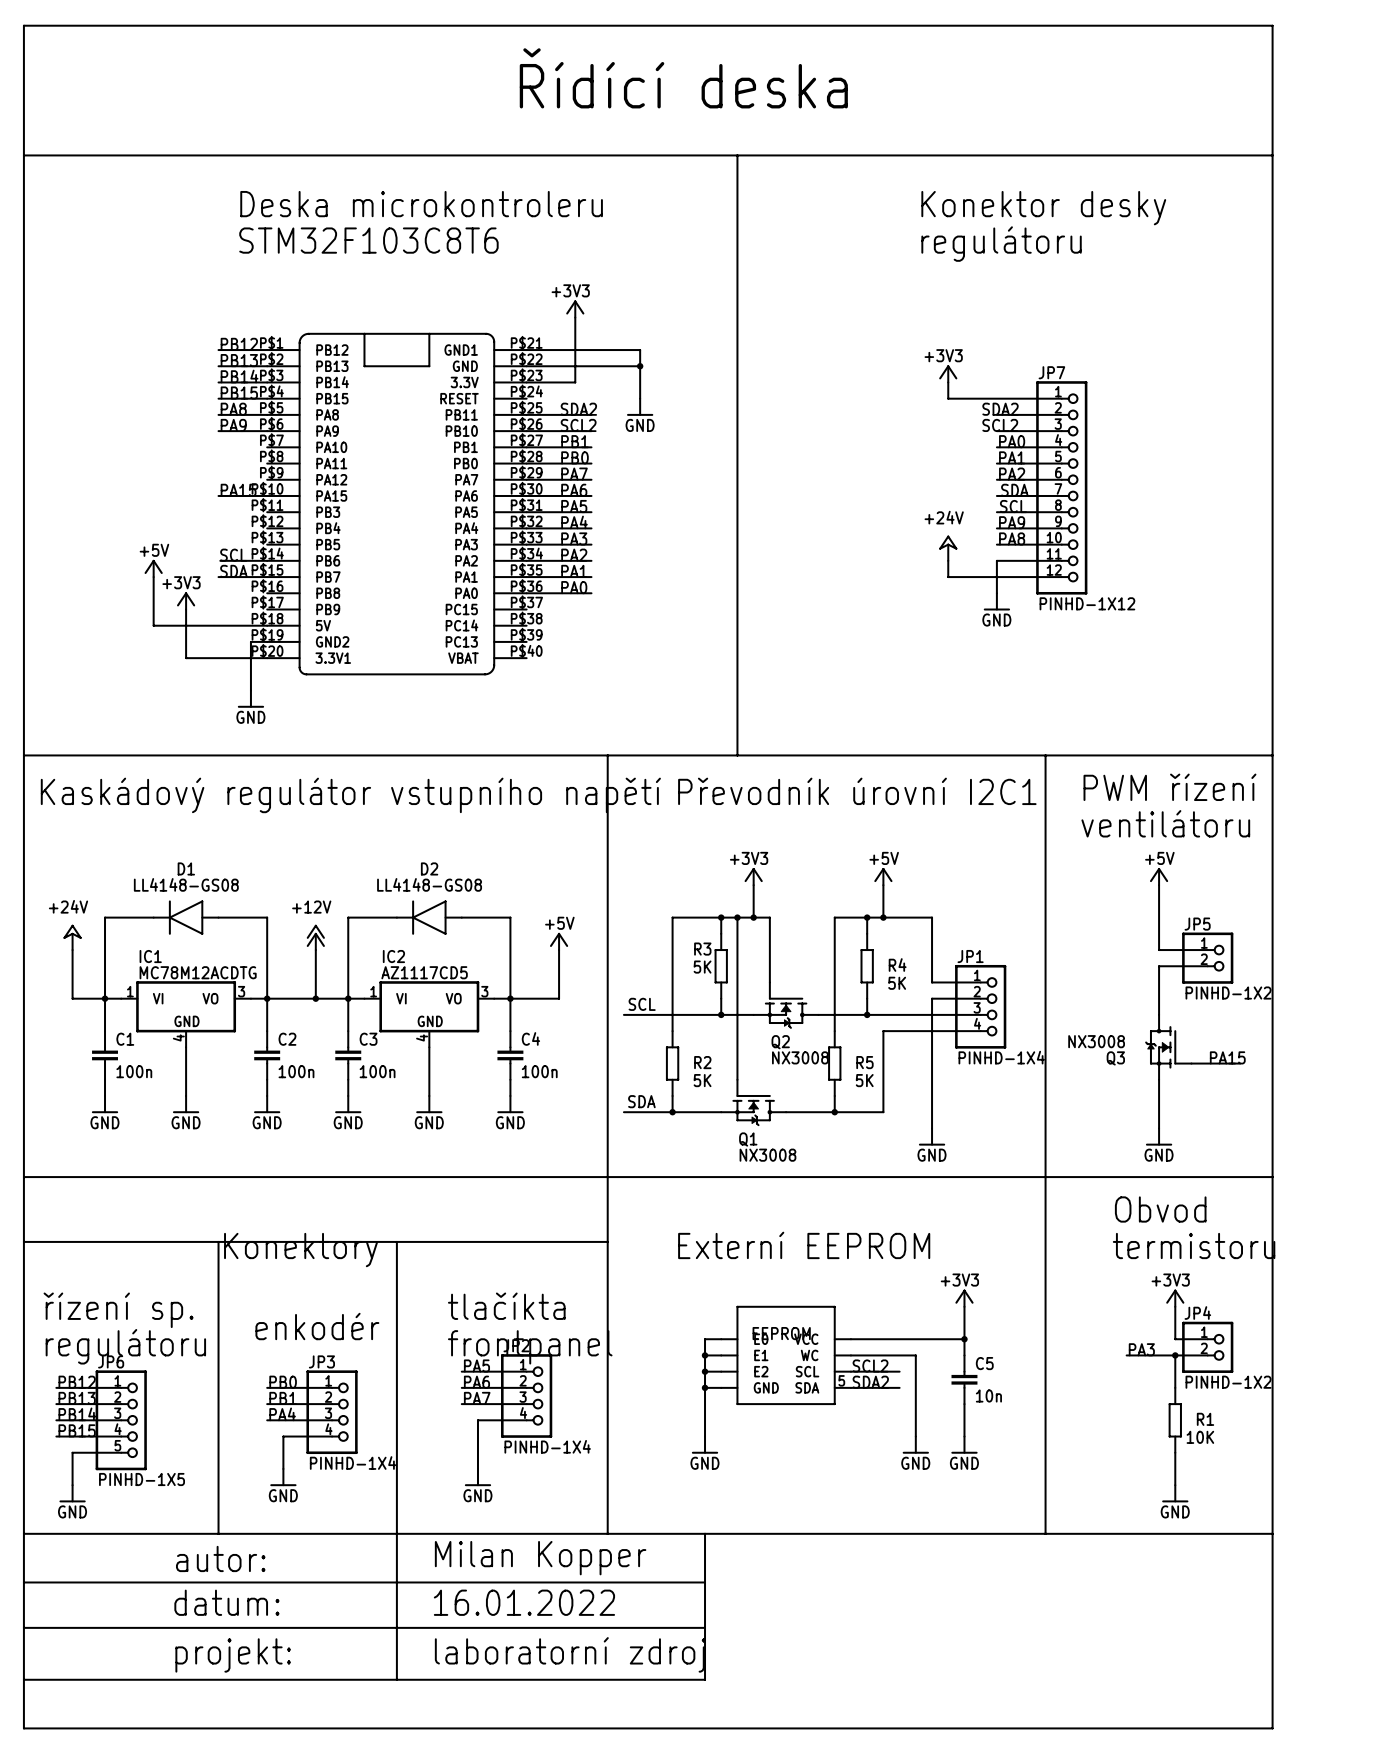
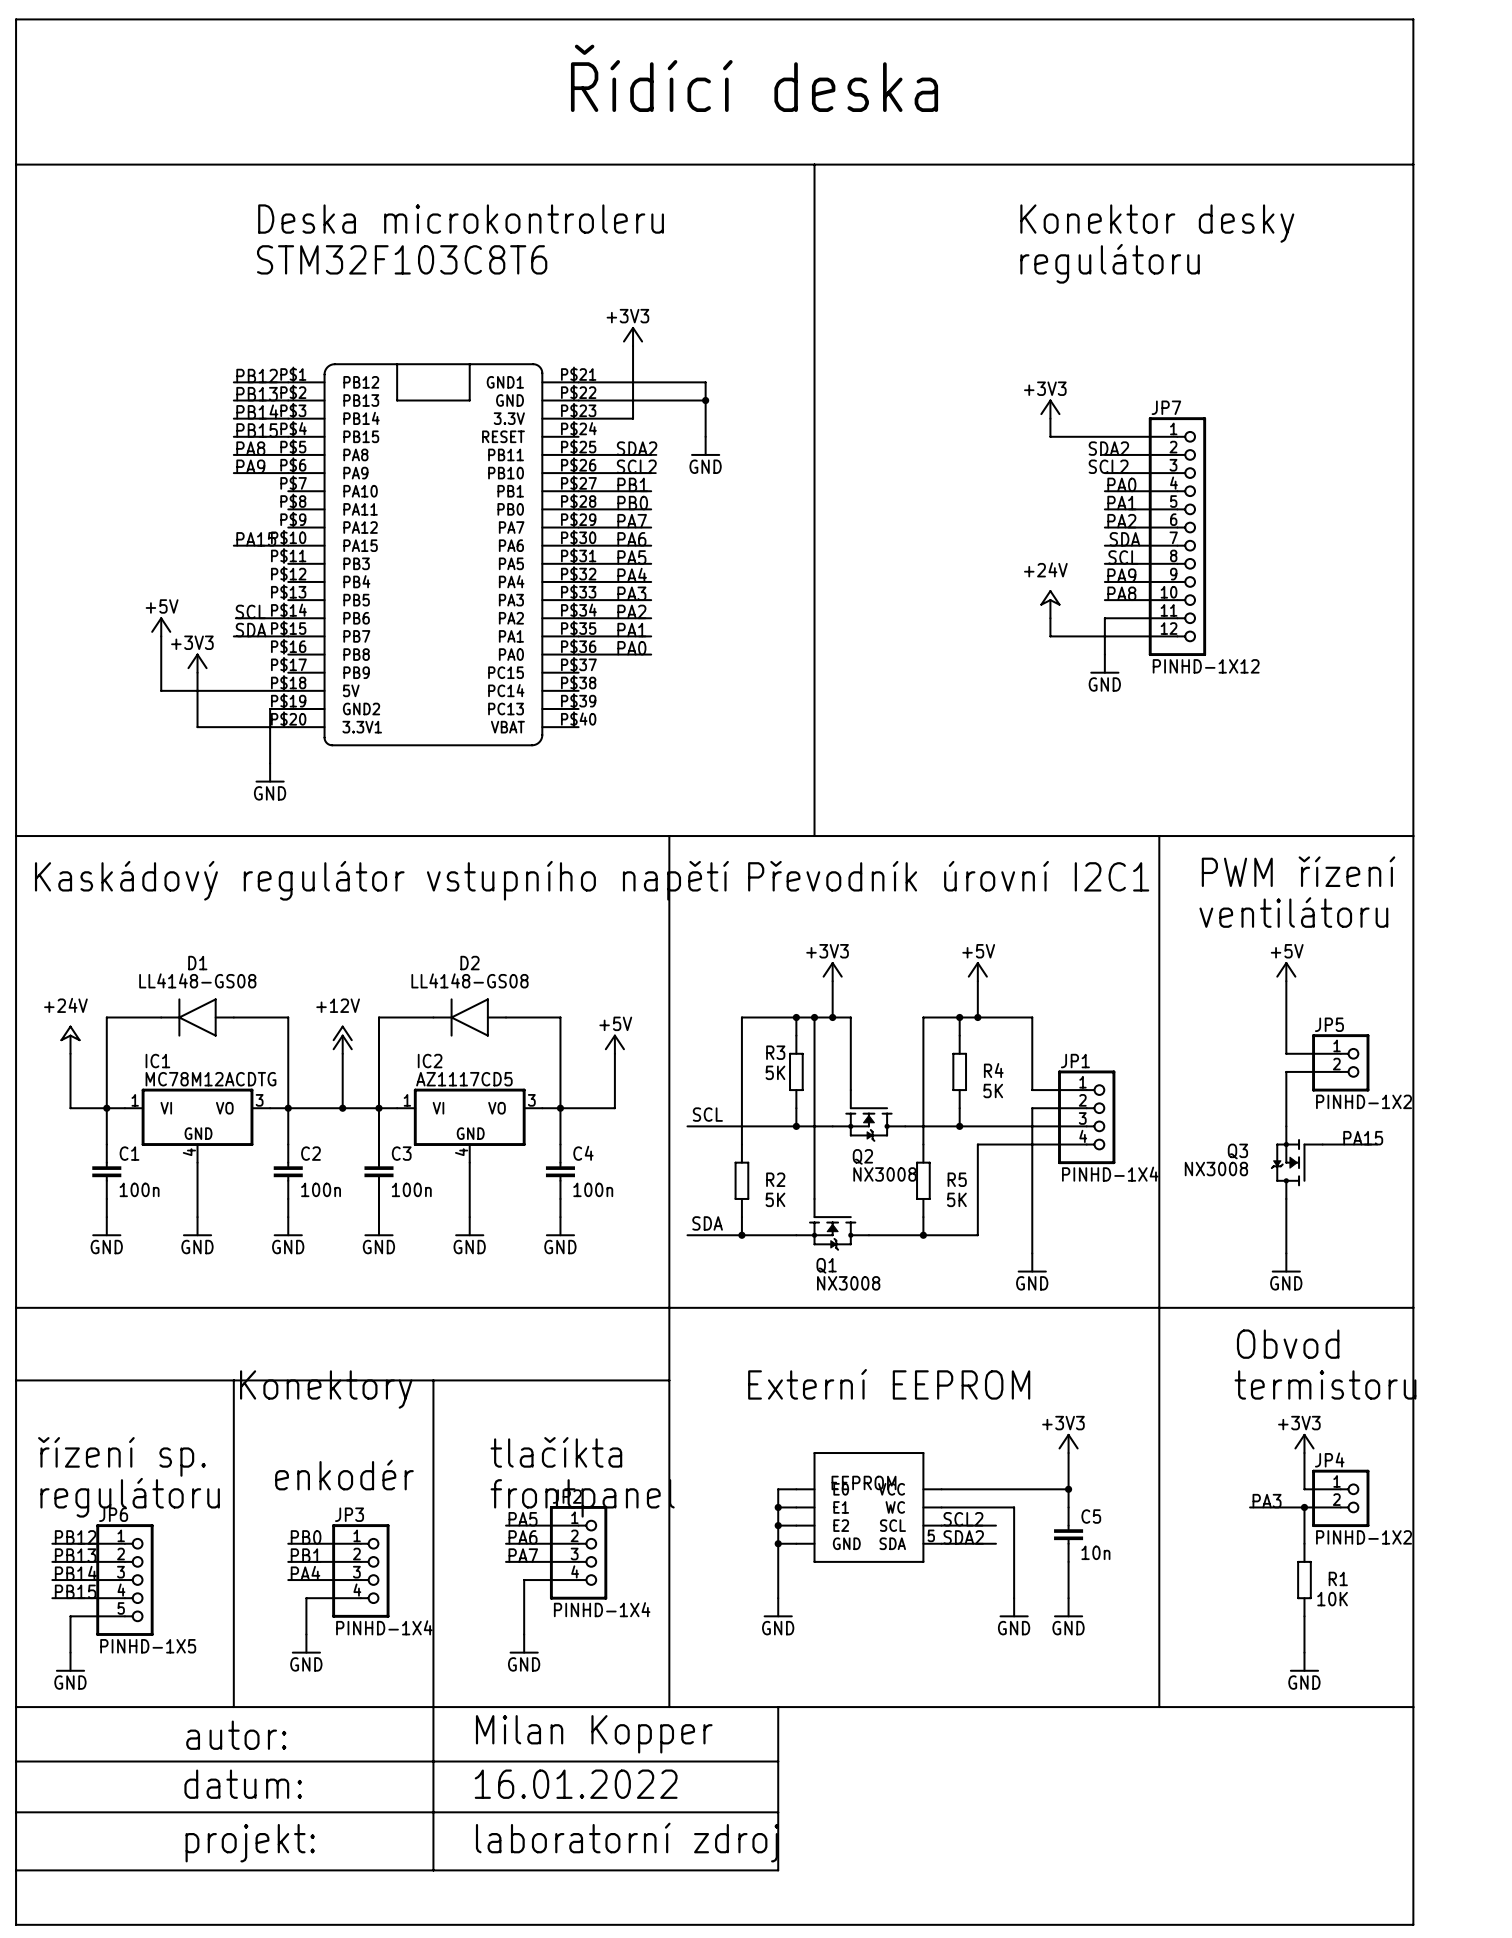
Q3 flip: as is (1160, 1047) -> up-down (1288, 1162)
label position: PA15 (1227, 1057) -> PA15 (1363, 1138)
wire: (1191, 1063) (1240, 1063) -> (1322, 1144) (1377, 1144)

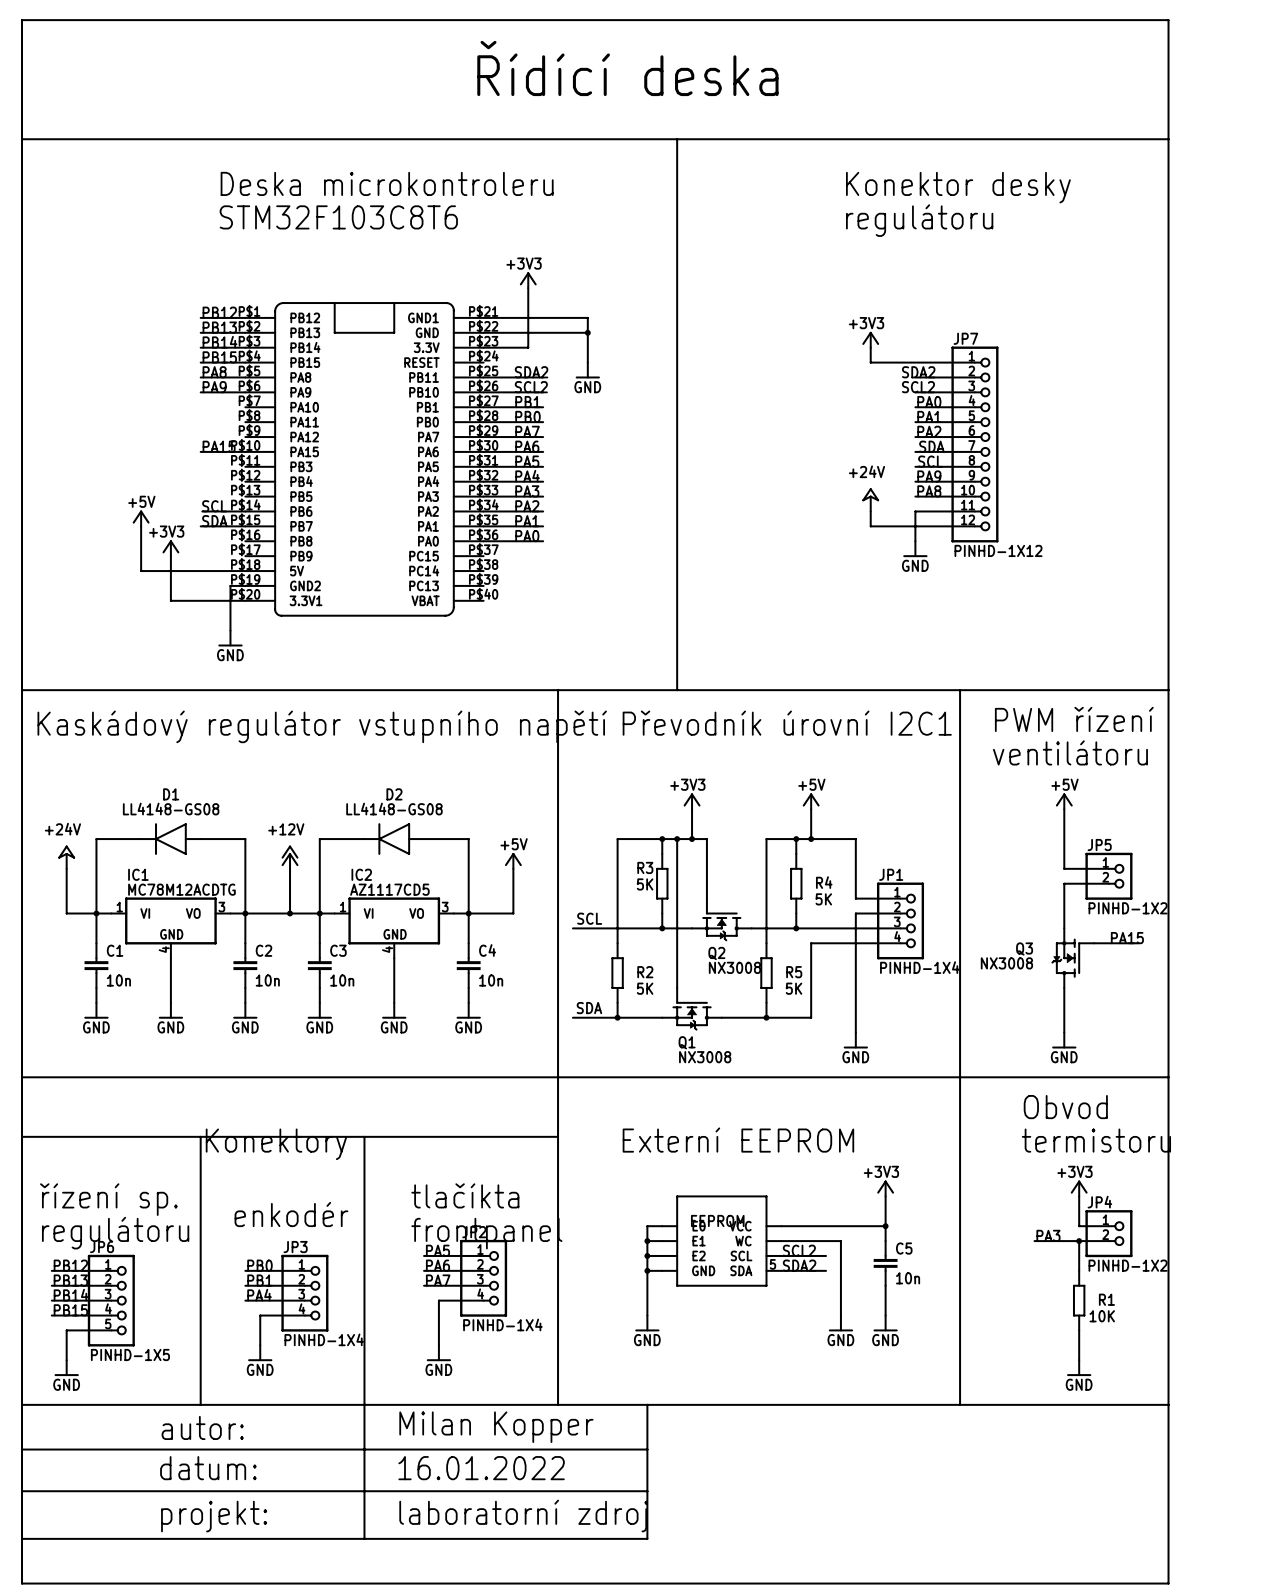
C1 value: 100n (139, 1189) -> 10n (118, 980)
C2 value: 100n (321, 1189) -> 10n (267, 980)
C3 value: 100n (411, 1189) -> 10n (342, 980)
C4 value: 100n (593, 1189) -> 10n (491, 980)

